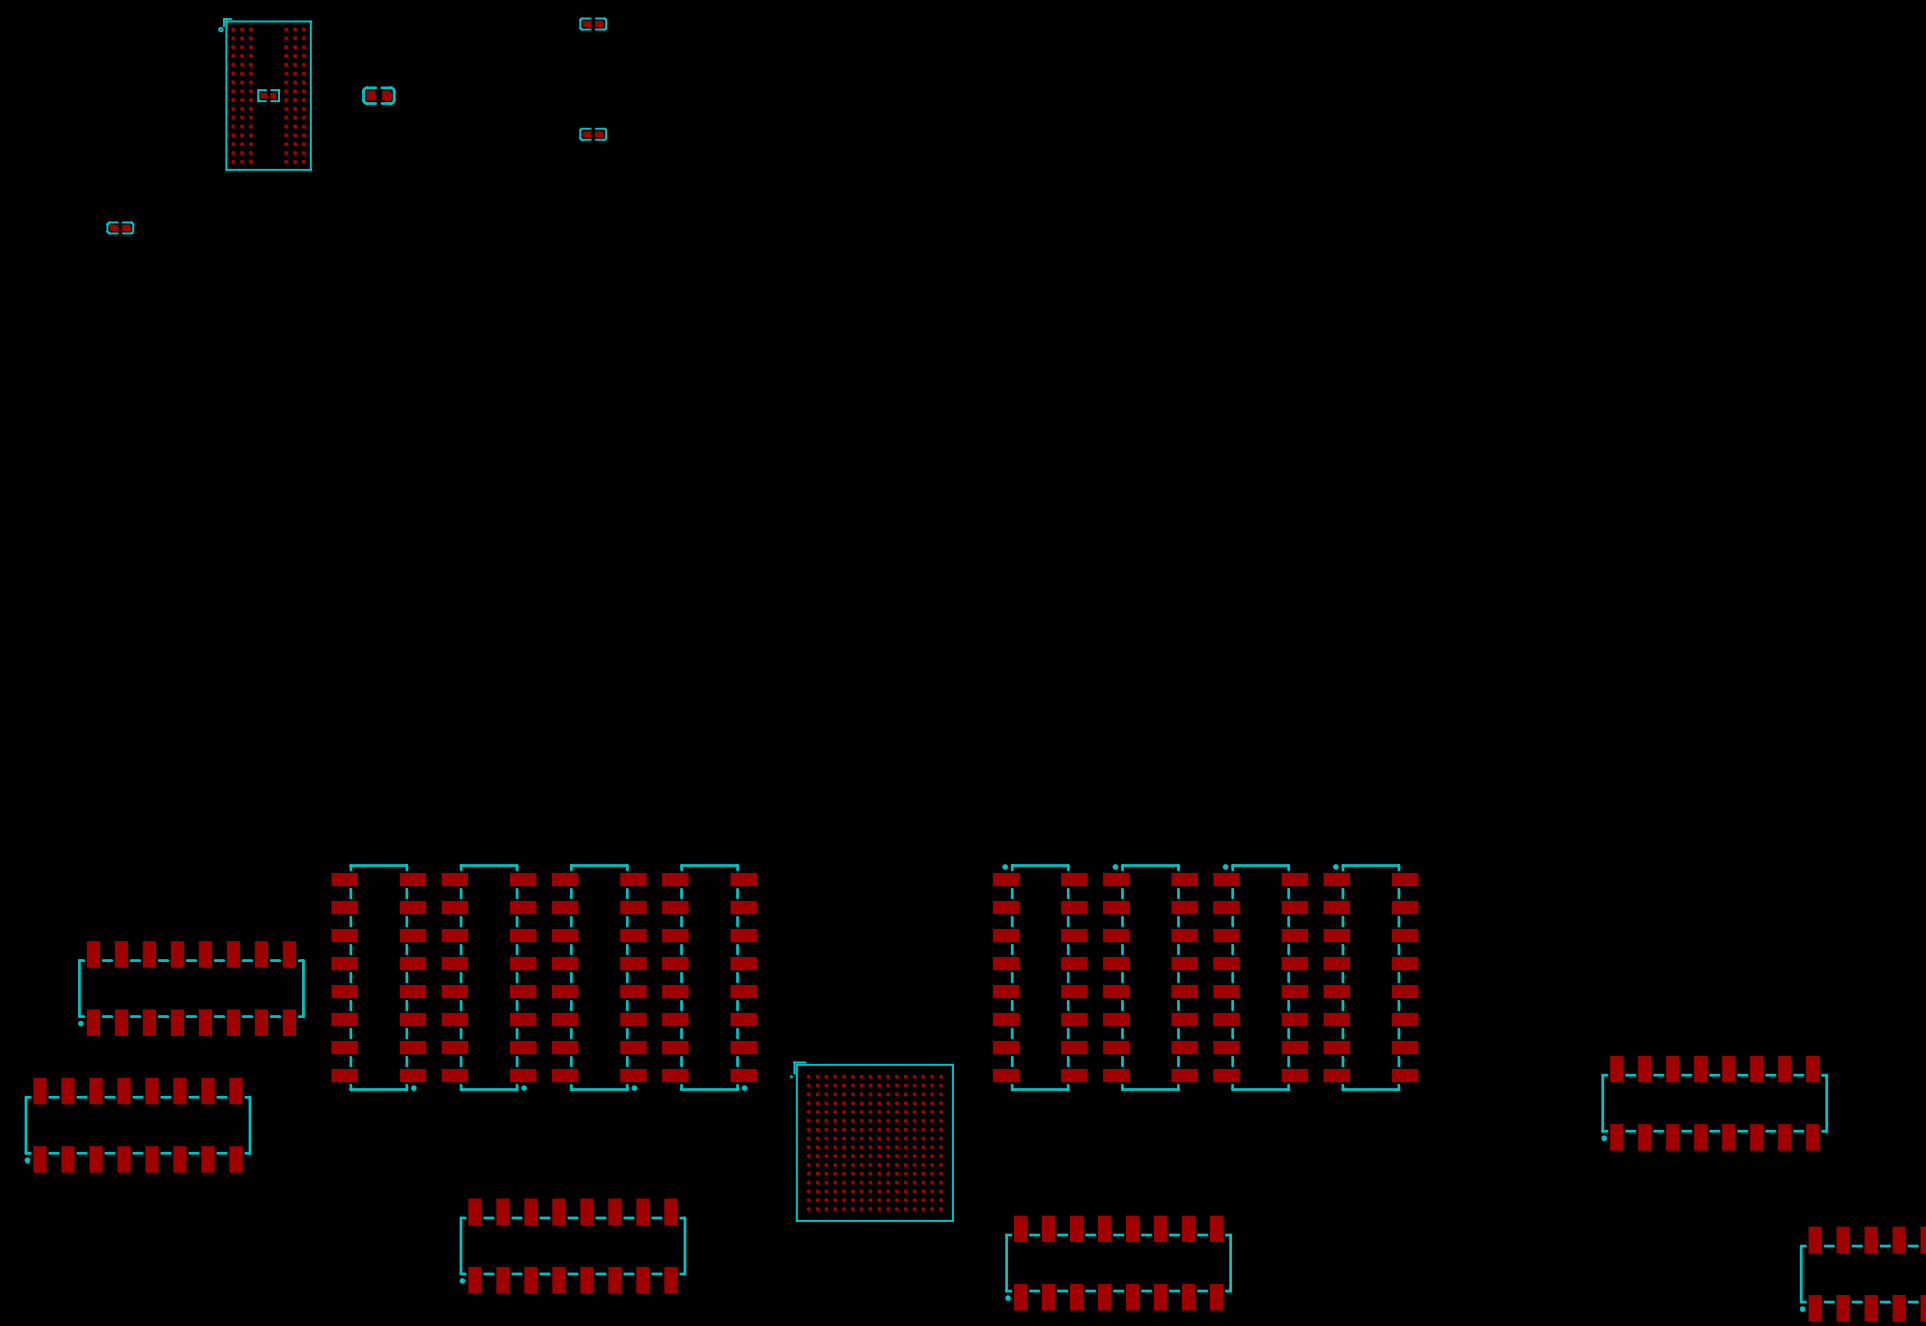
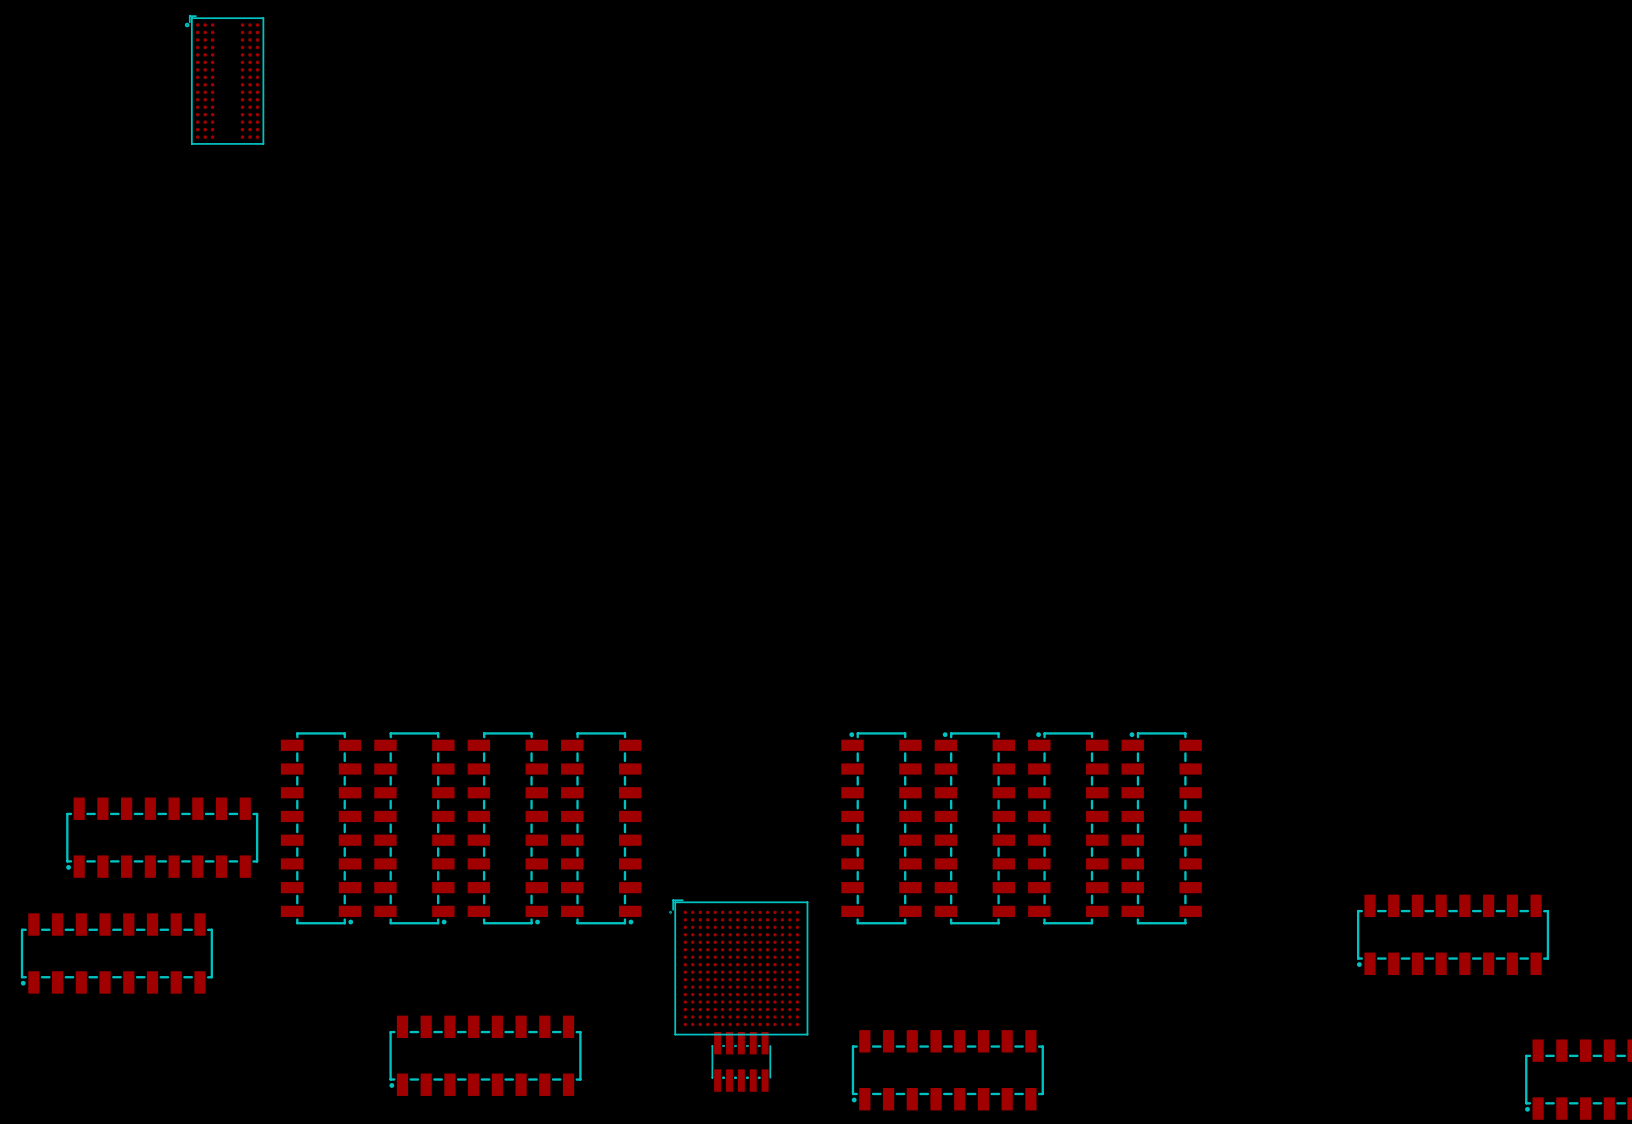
part: (593, 24) -> none
part: (268, 95) -> none
part: (378, 95) -> none
part: (593, 134) -> none
part: (120, 227) -> none
part: none -> (741, 1061)

